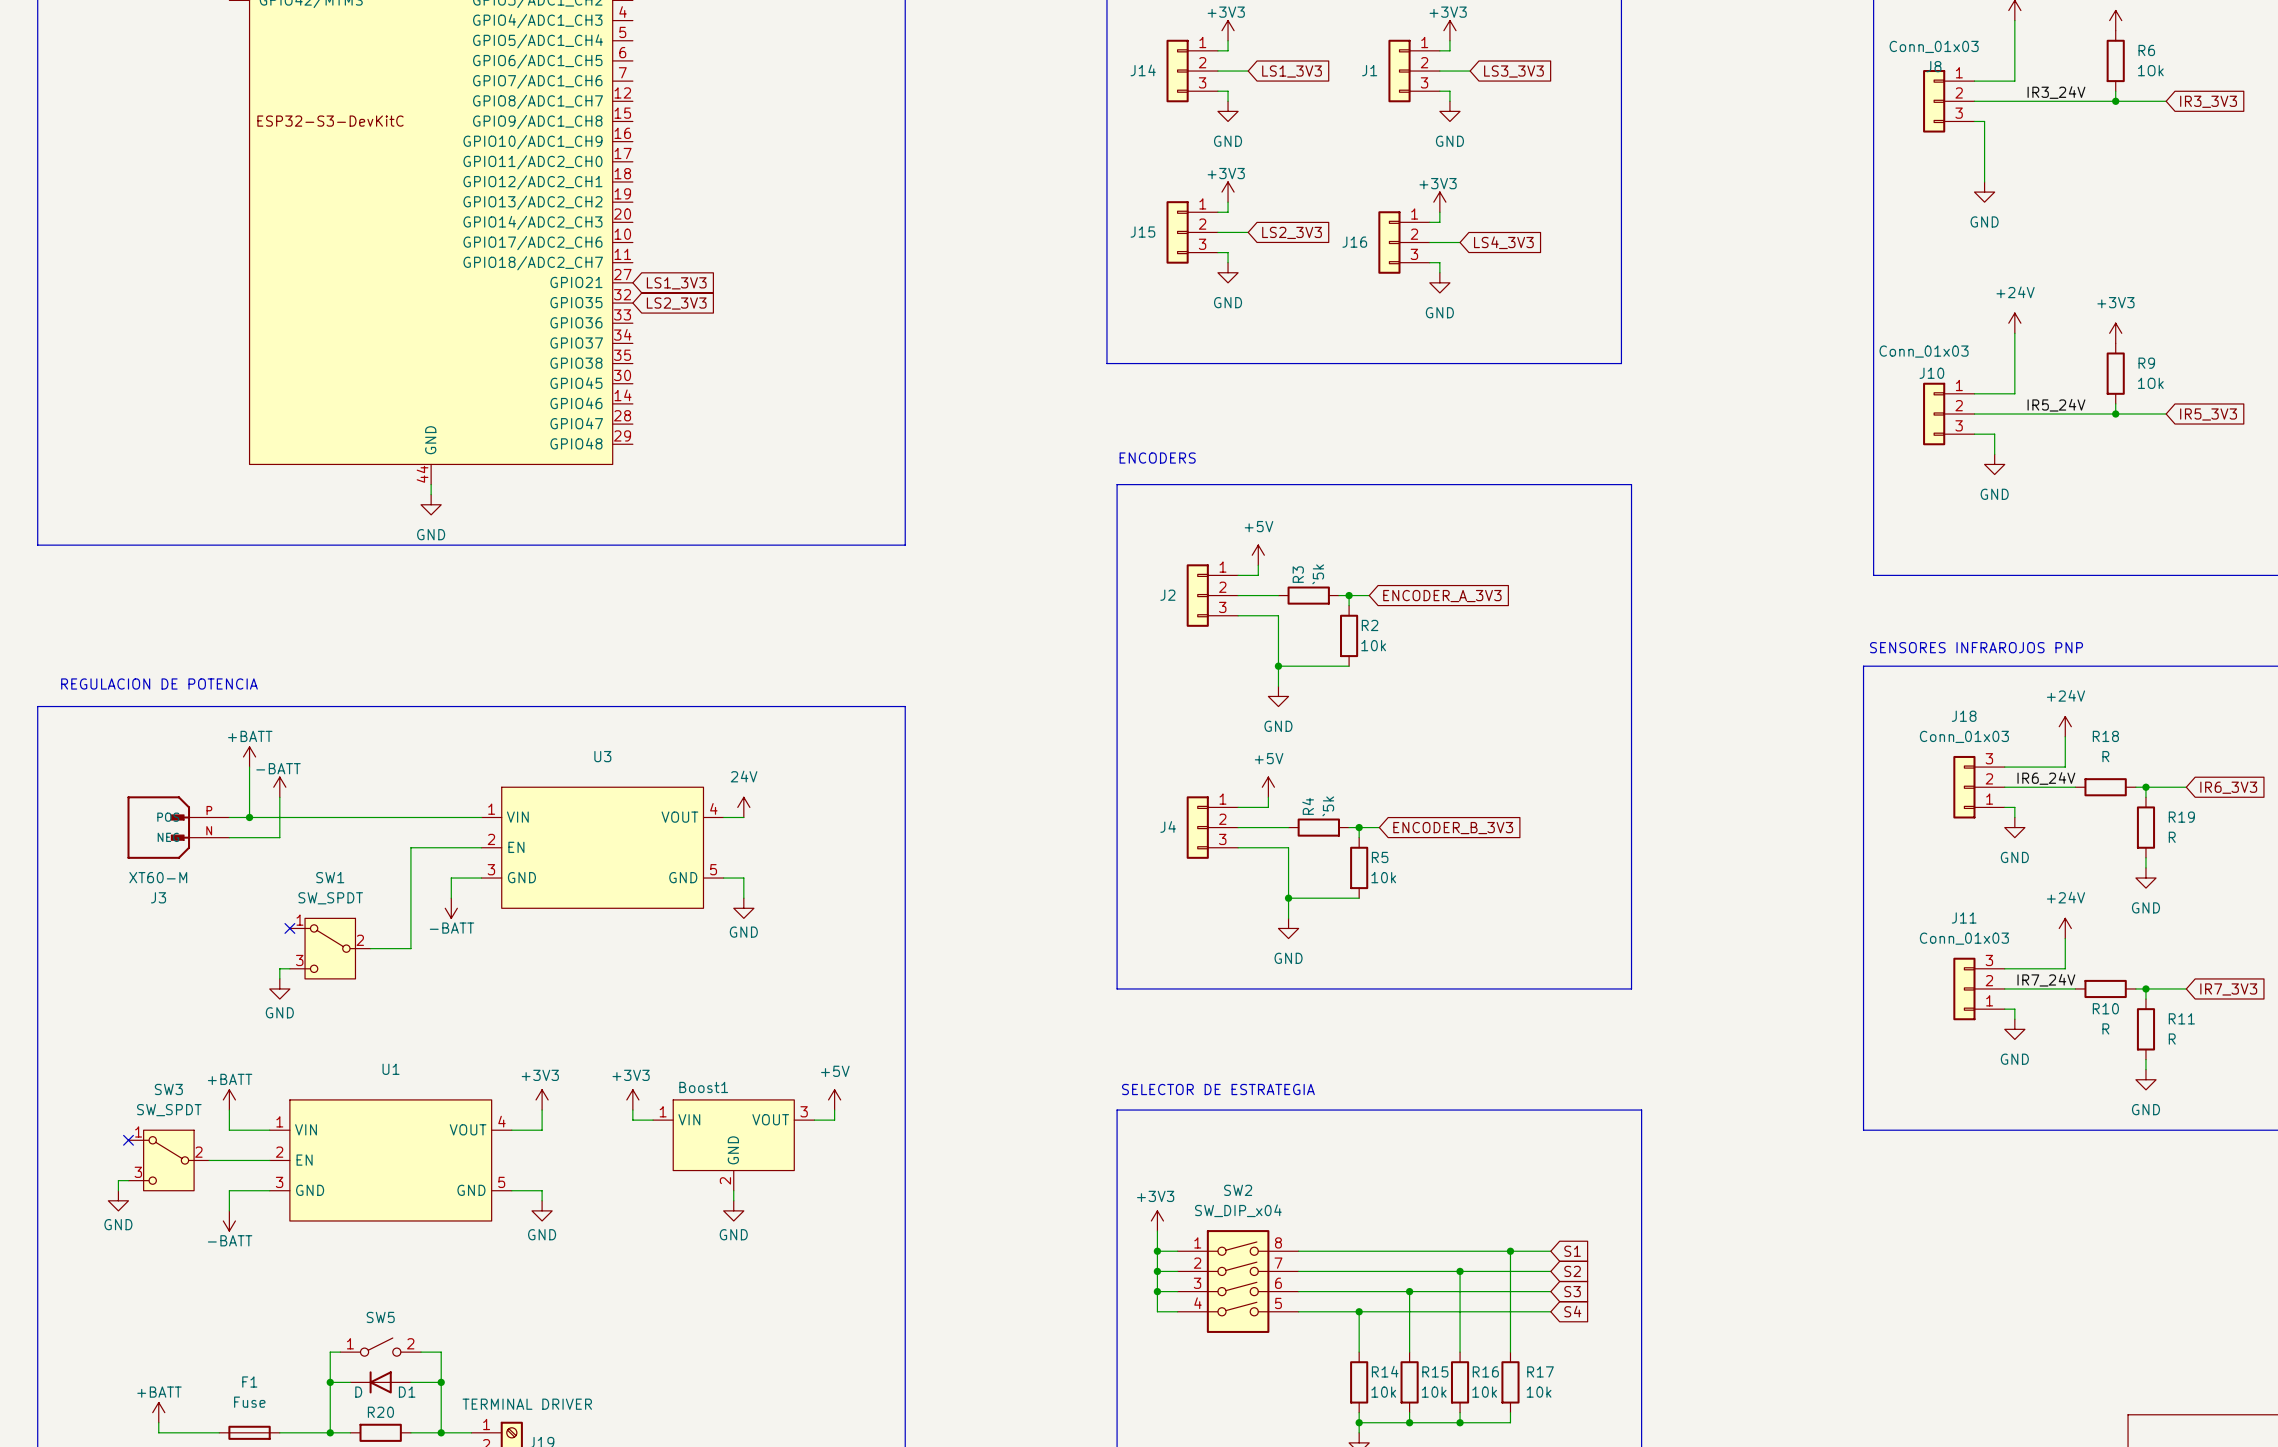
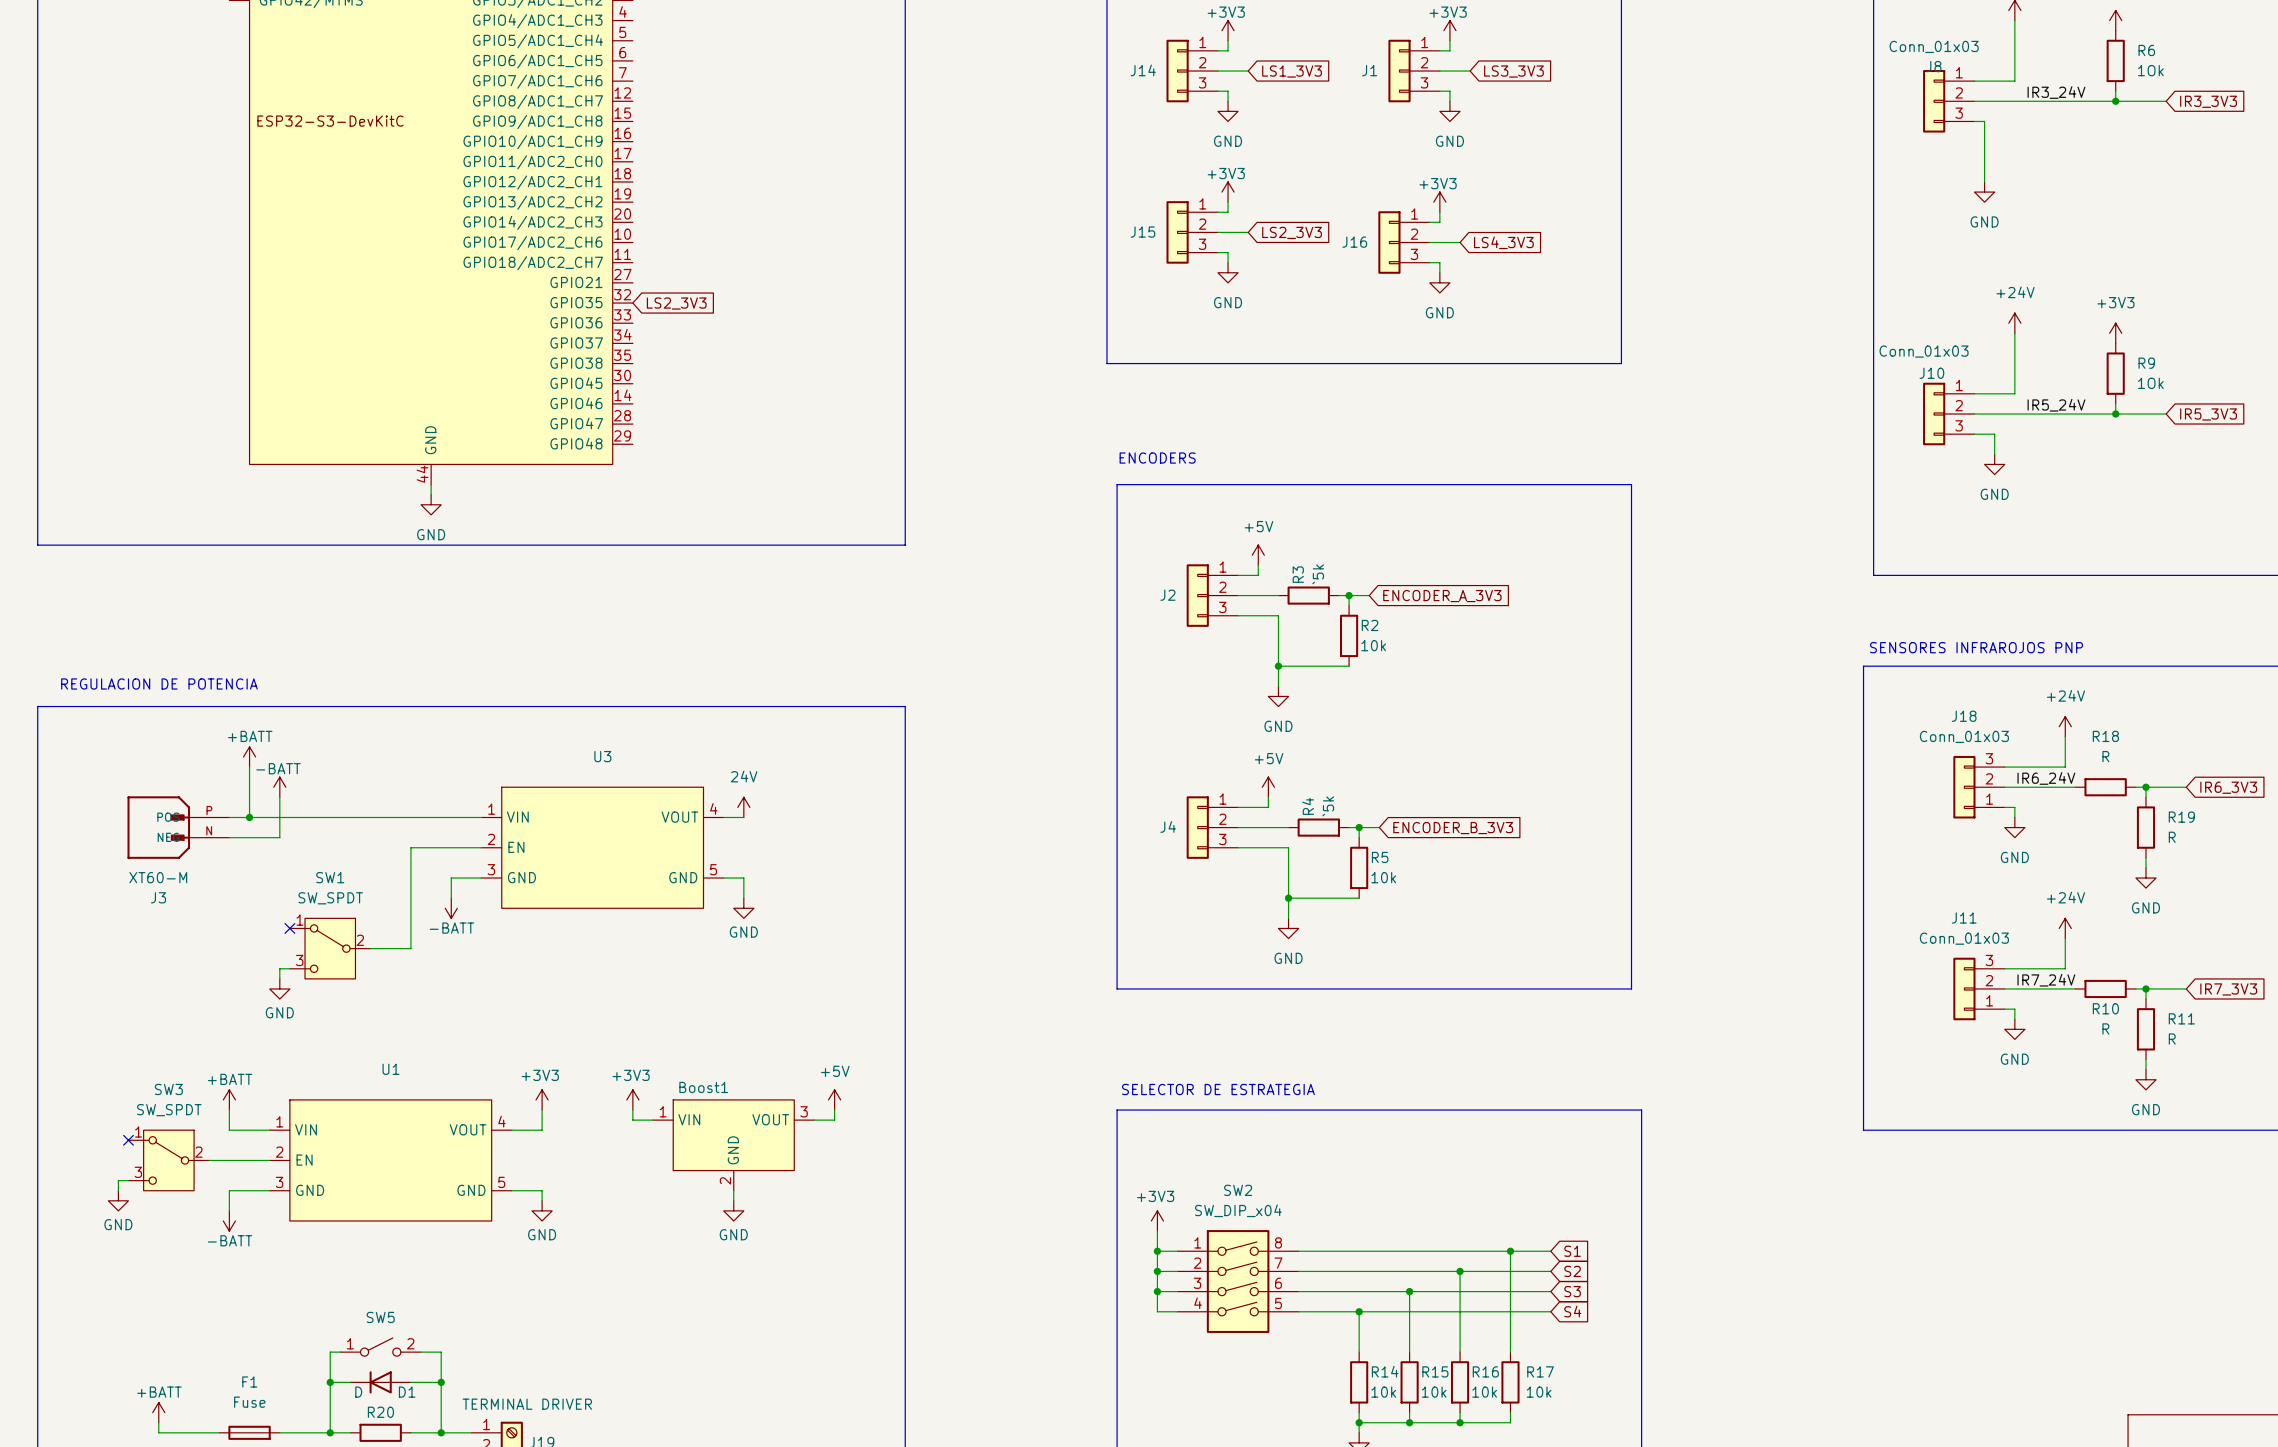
global label: LS1_3V3 (676, 283) -> none

